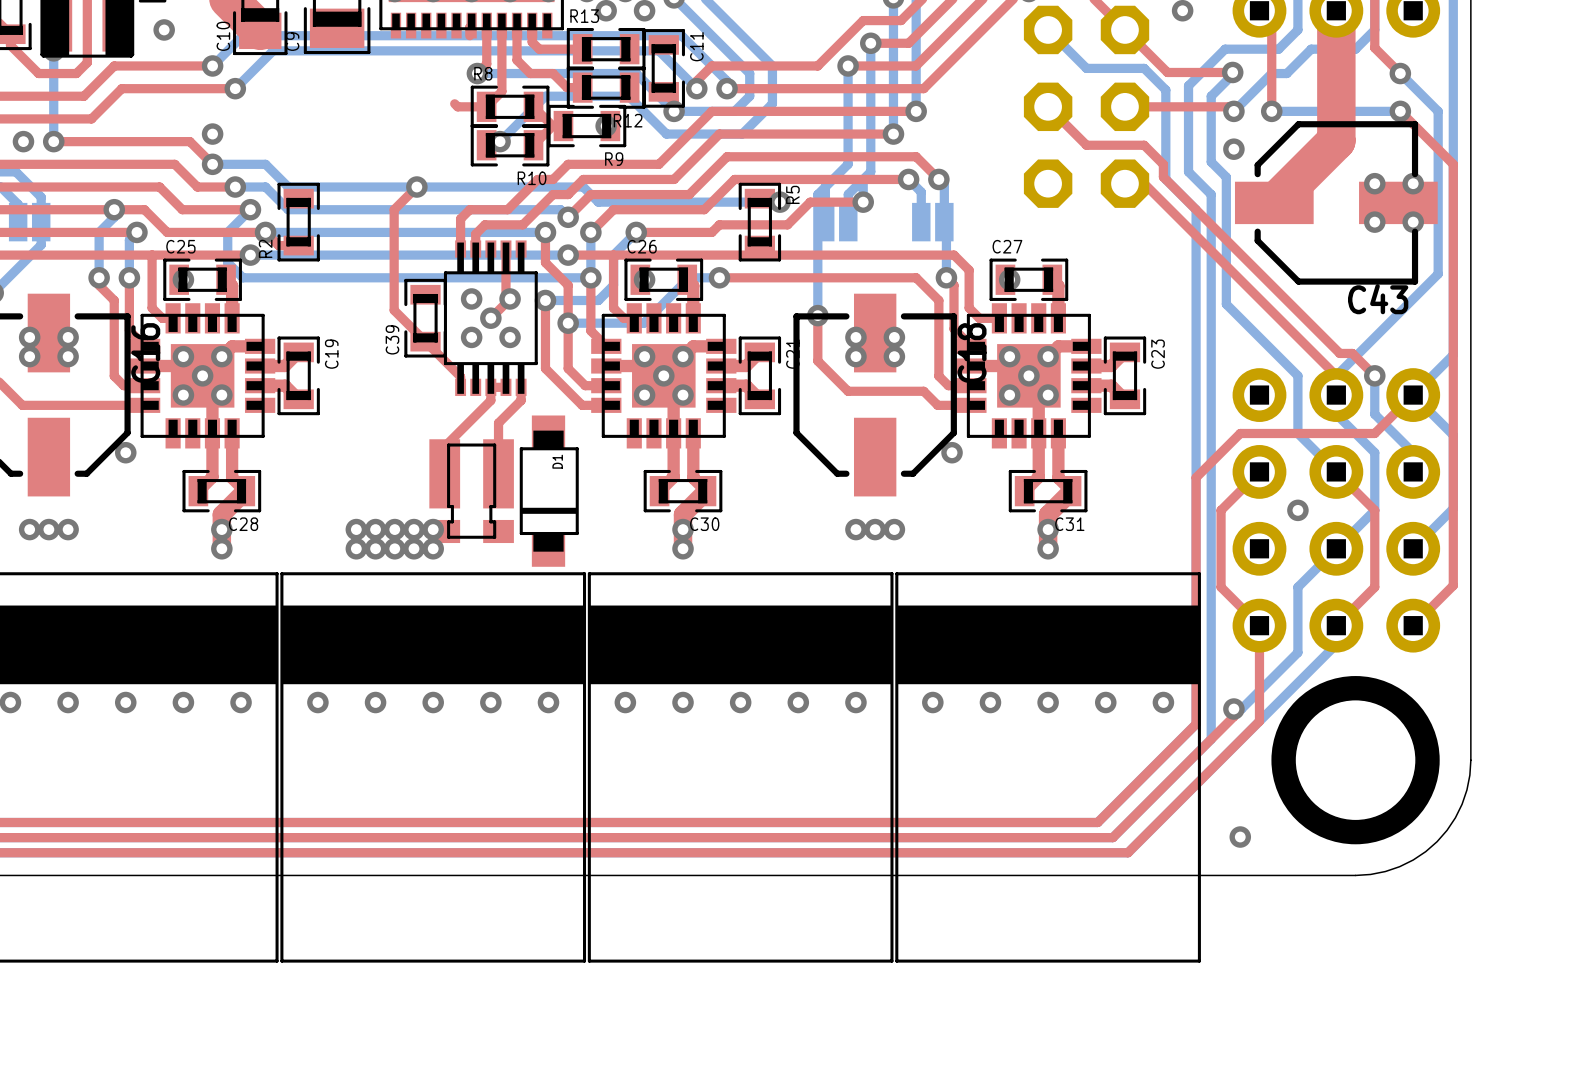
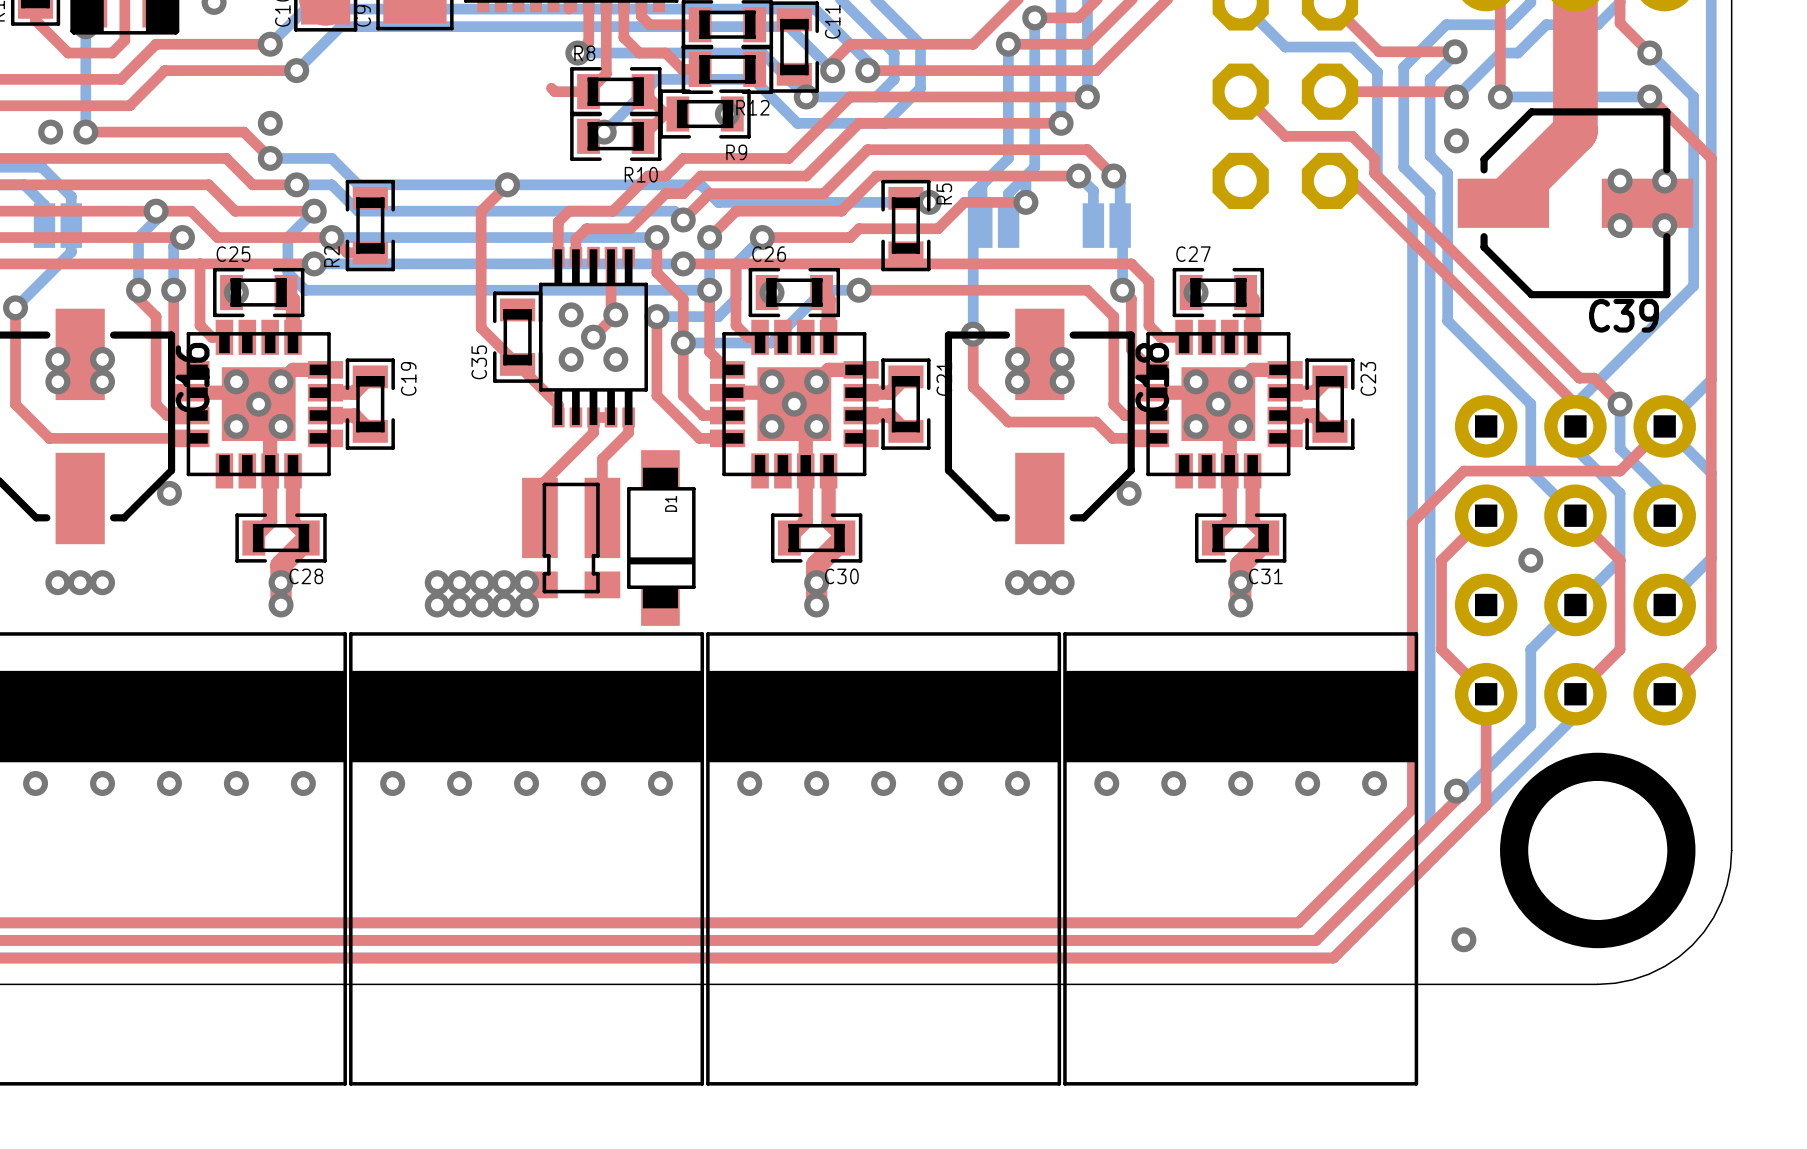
C43 name: C43 (1378, 299) -> C39 (1623, 315)
C39 name: C39 (392, 339) -> C35 (479, 362)

